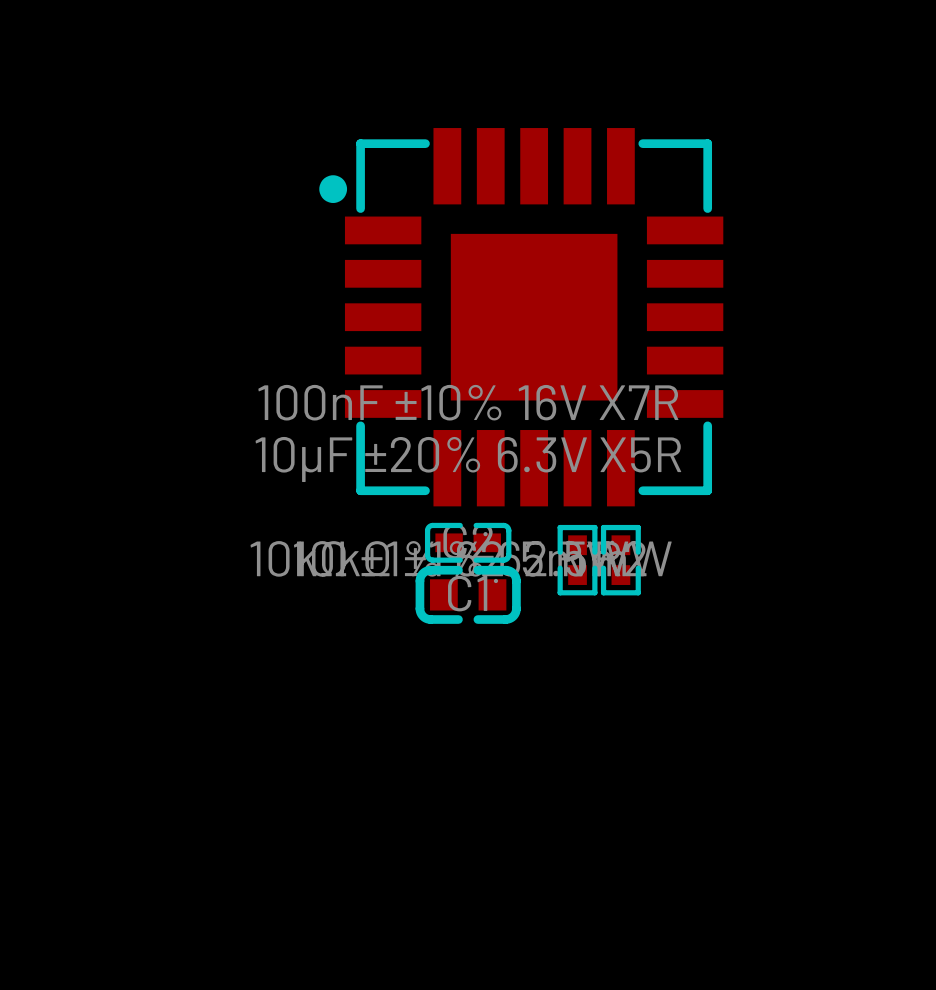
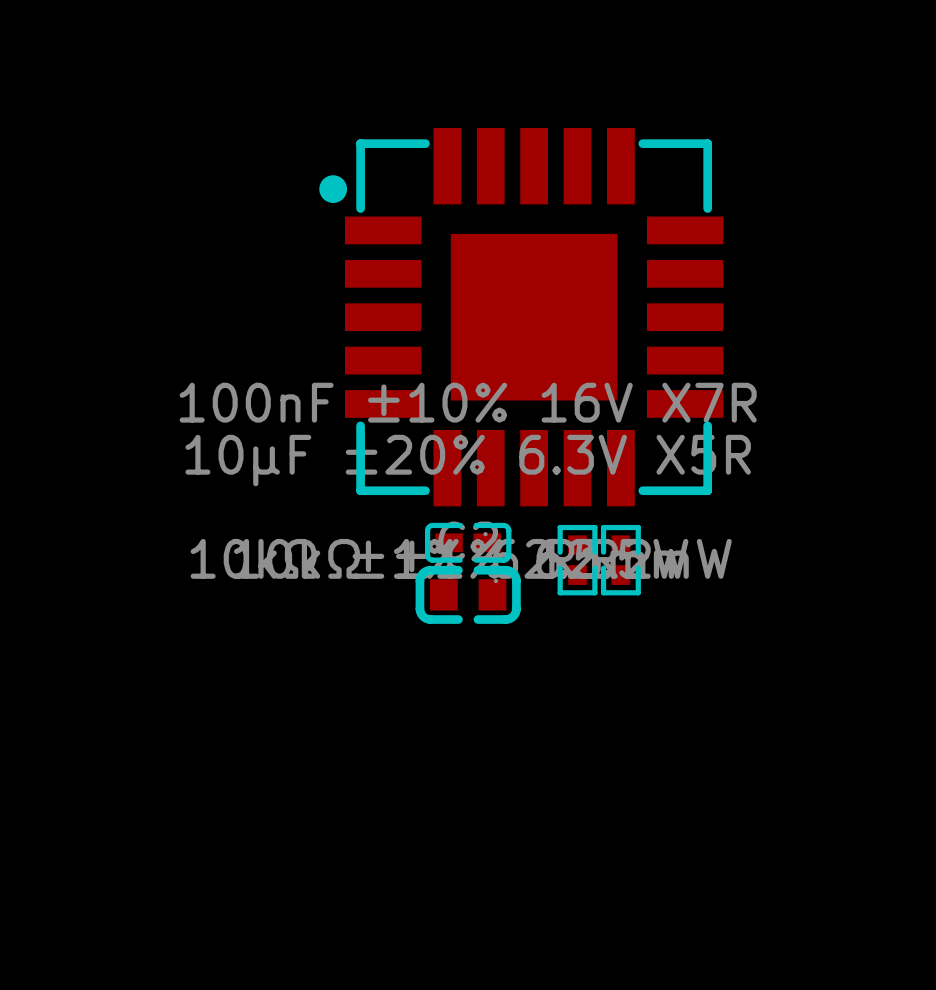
C1 name: C1 (467, 593) -> none

